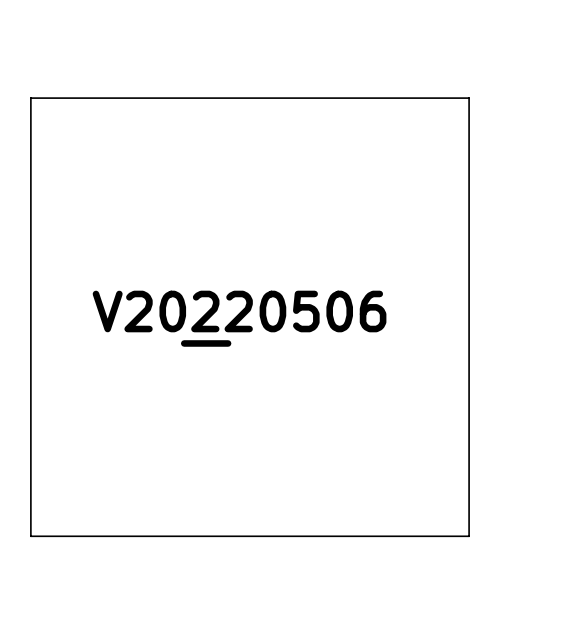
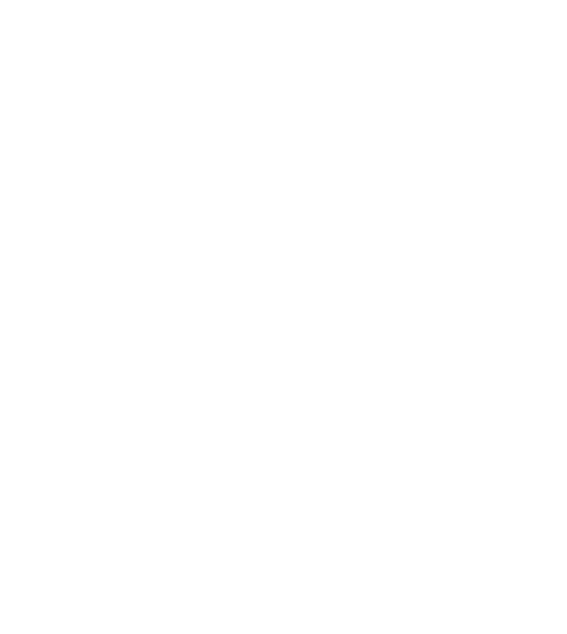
board edge: (30, 98) (469, 98) (469, 536) (30, 536) (30, 98) -> none
drawing: [180, 340, 232, 347] -> none

